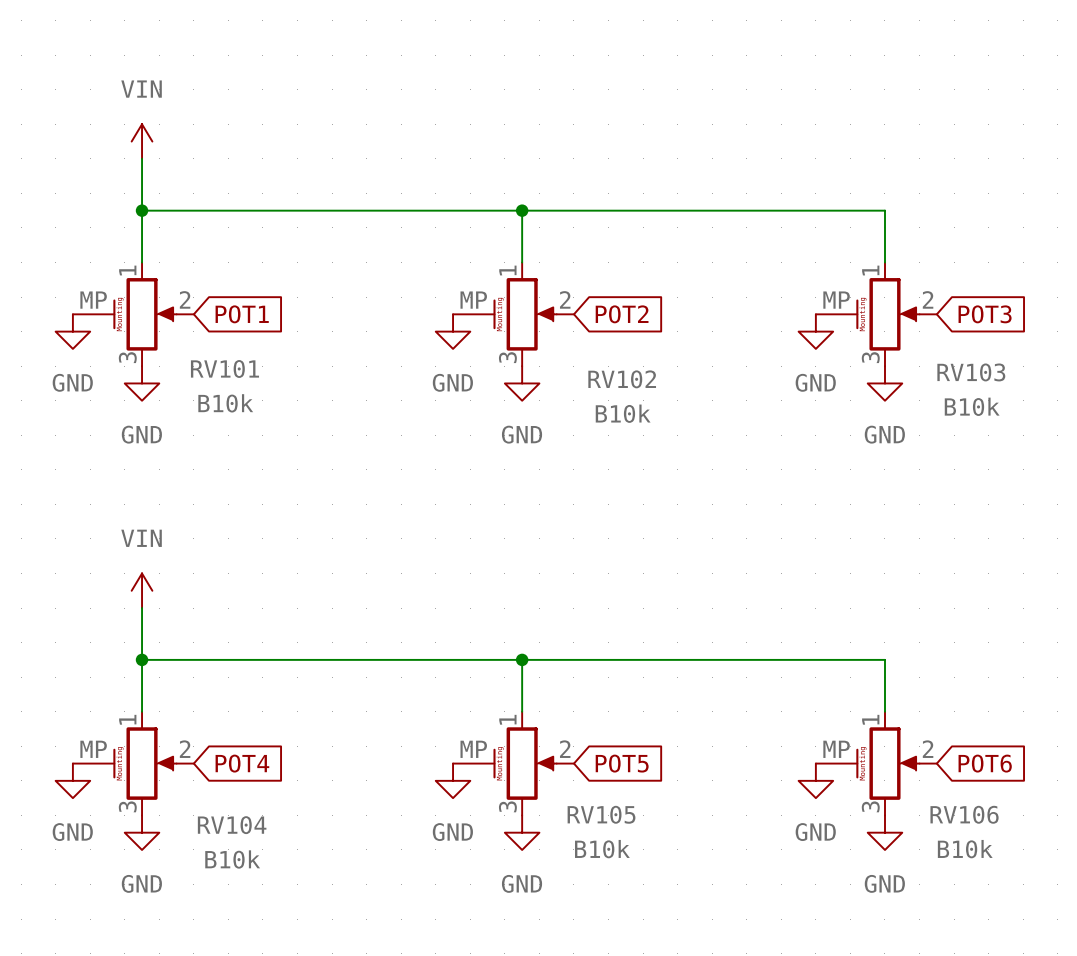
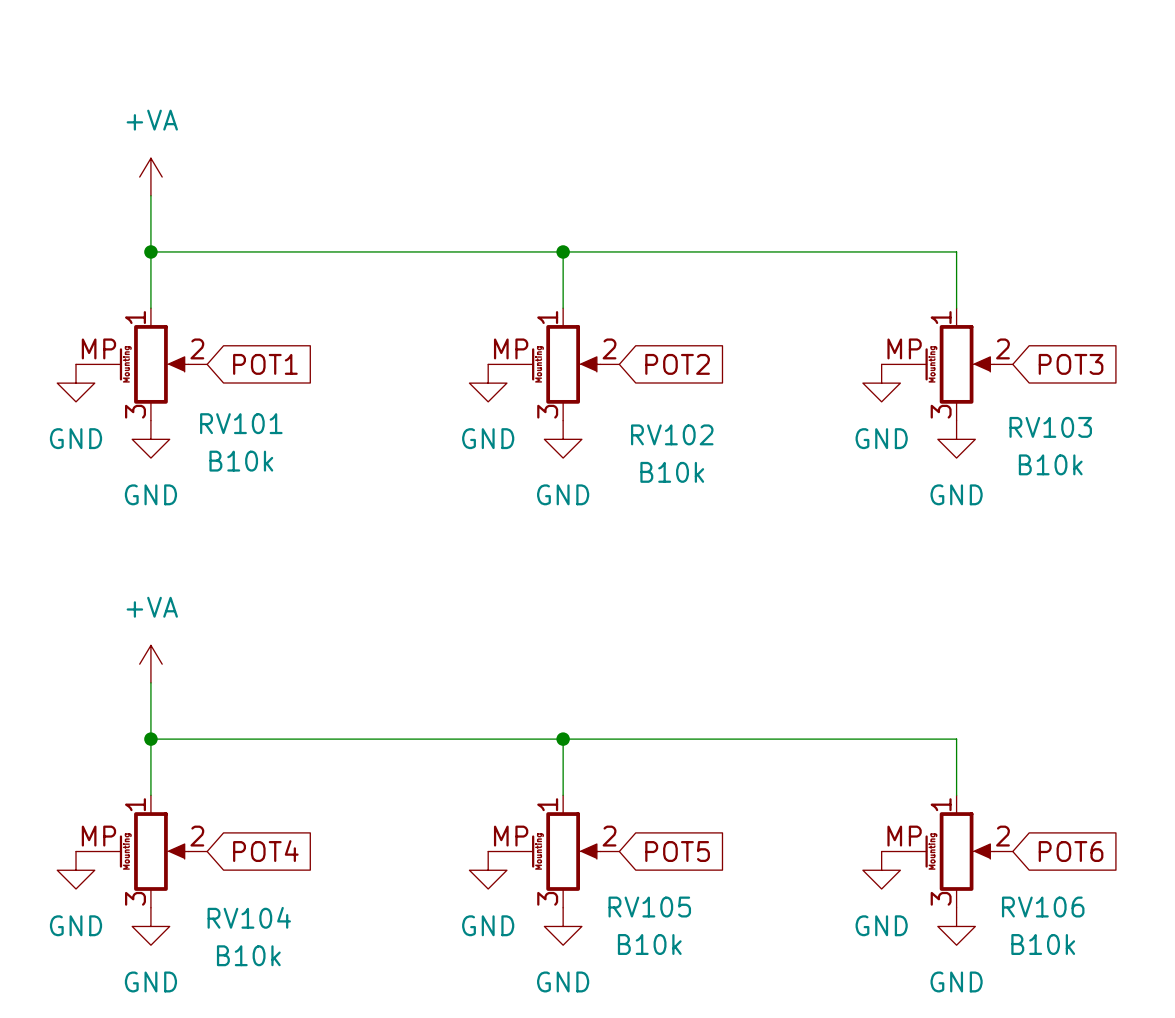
power symbol: VIN (142, 141) -> +VA (150, 177)
power symbol: VIN (142, 590) -> +VA (150, 664)

